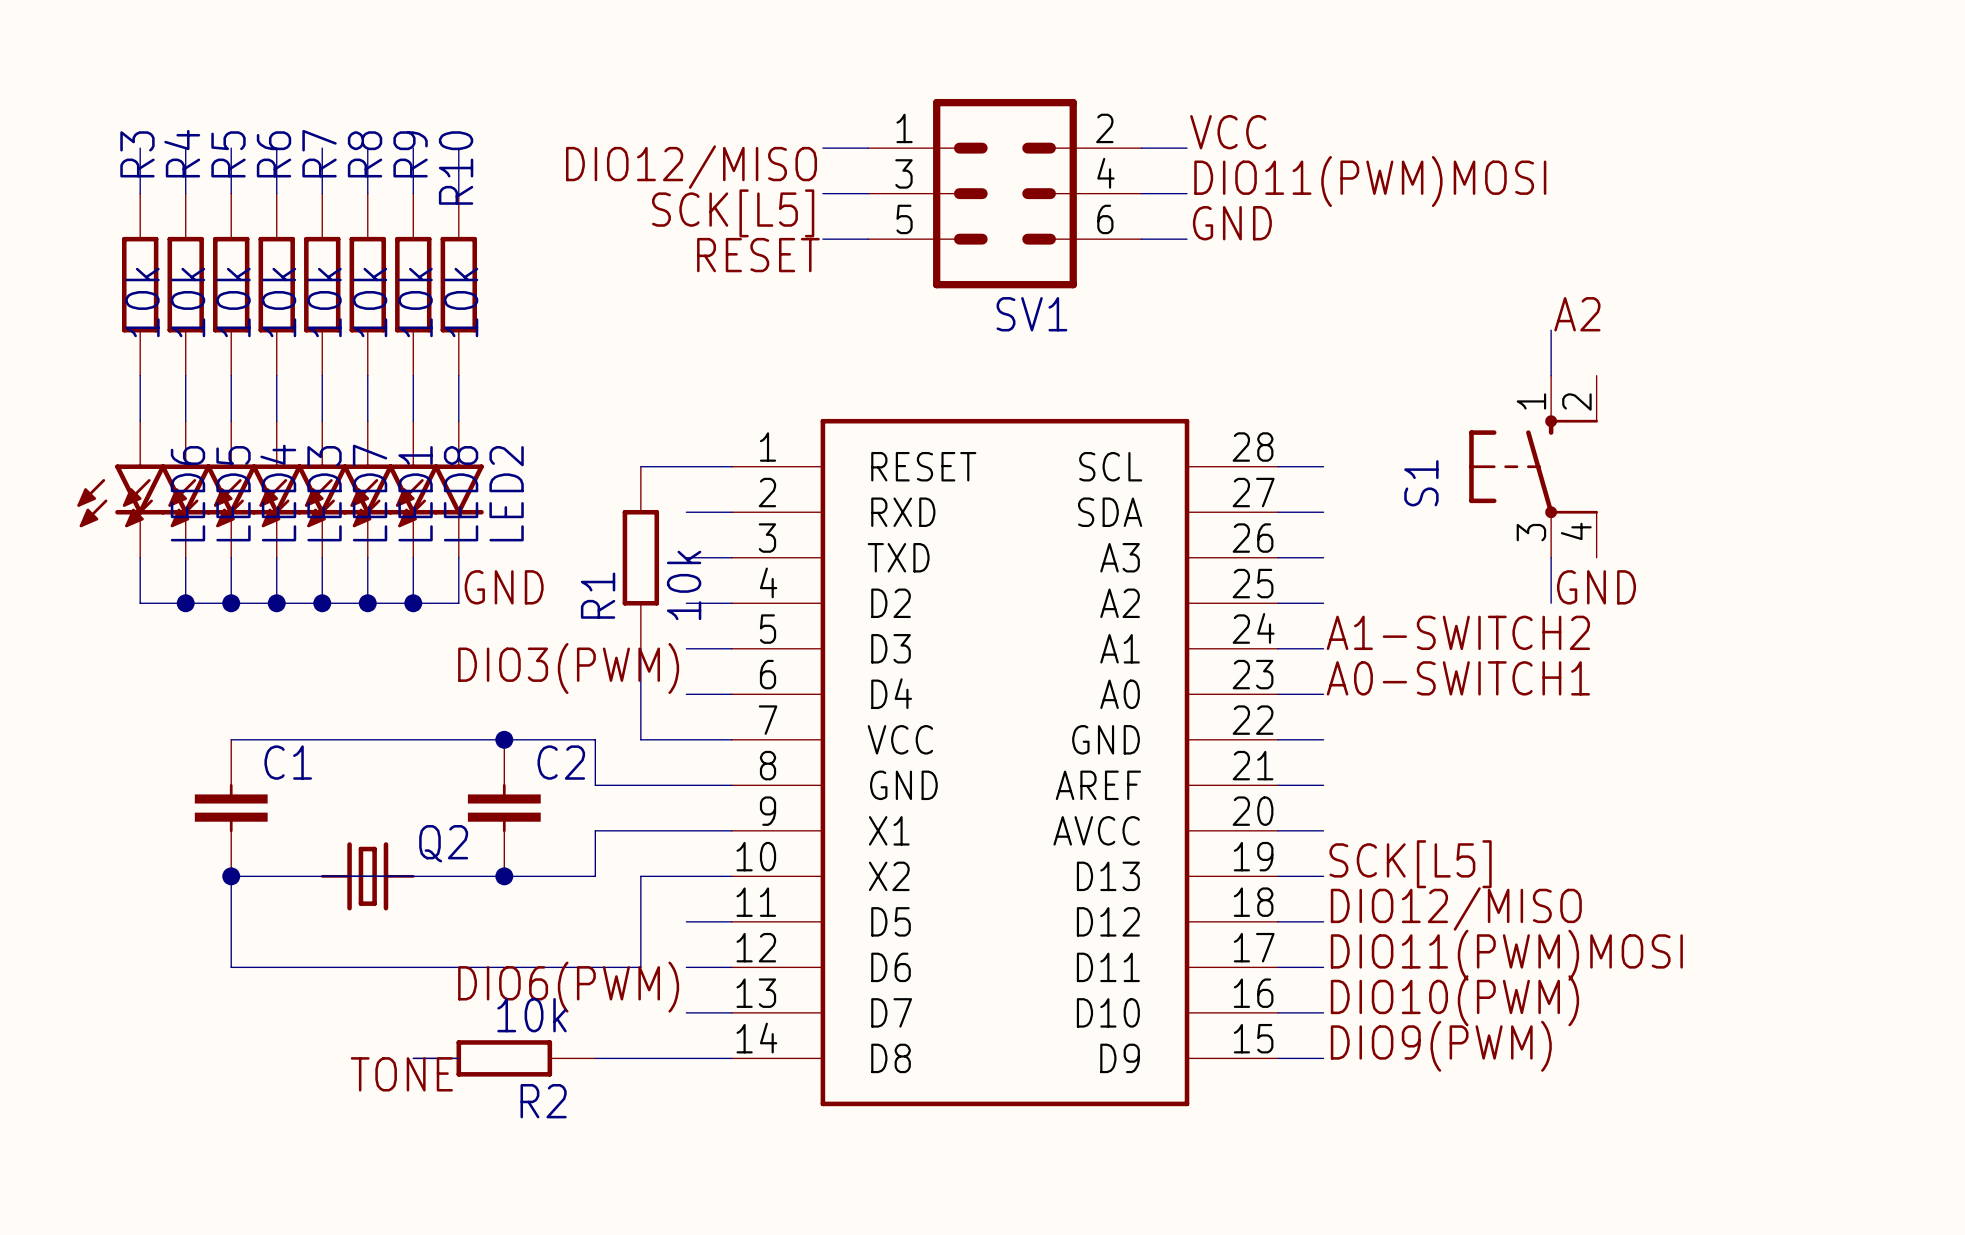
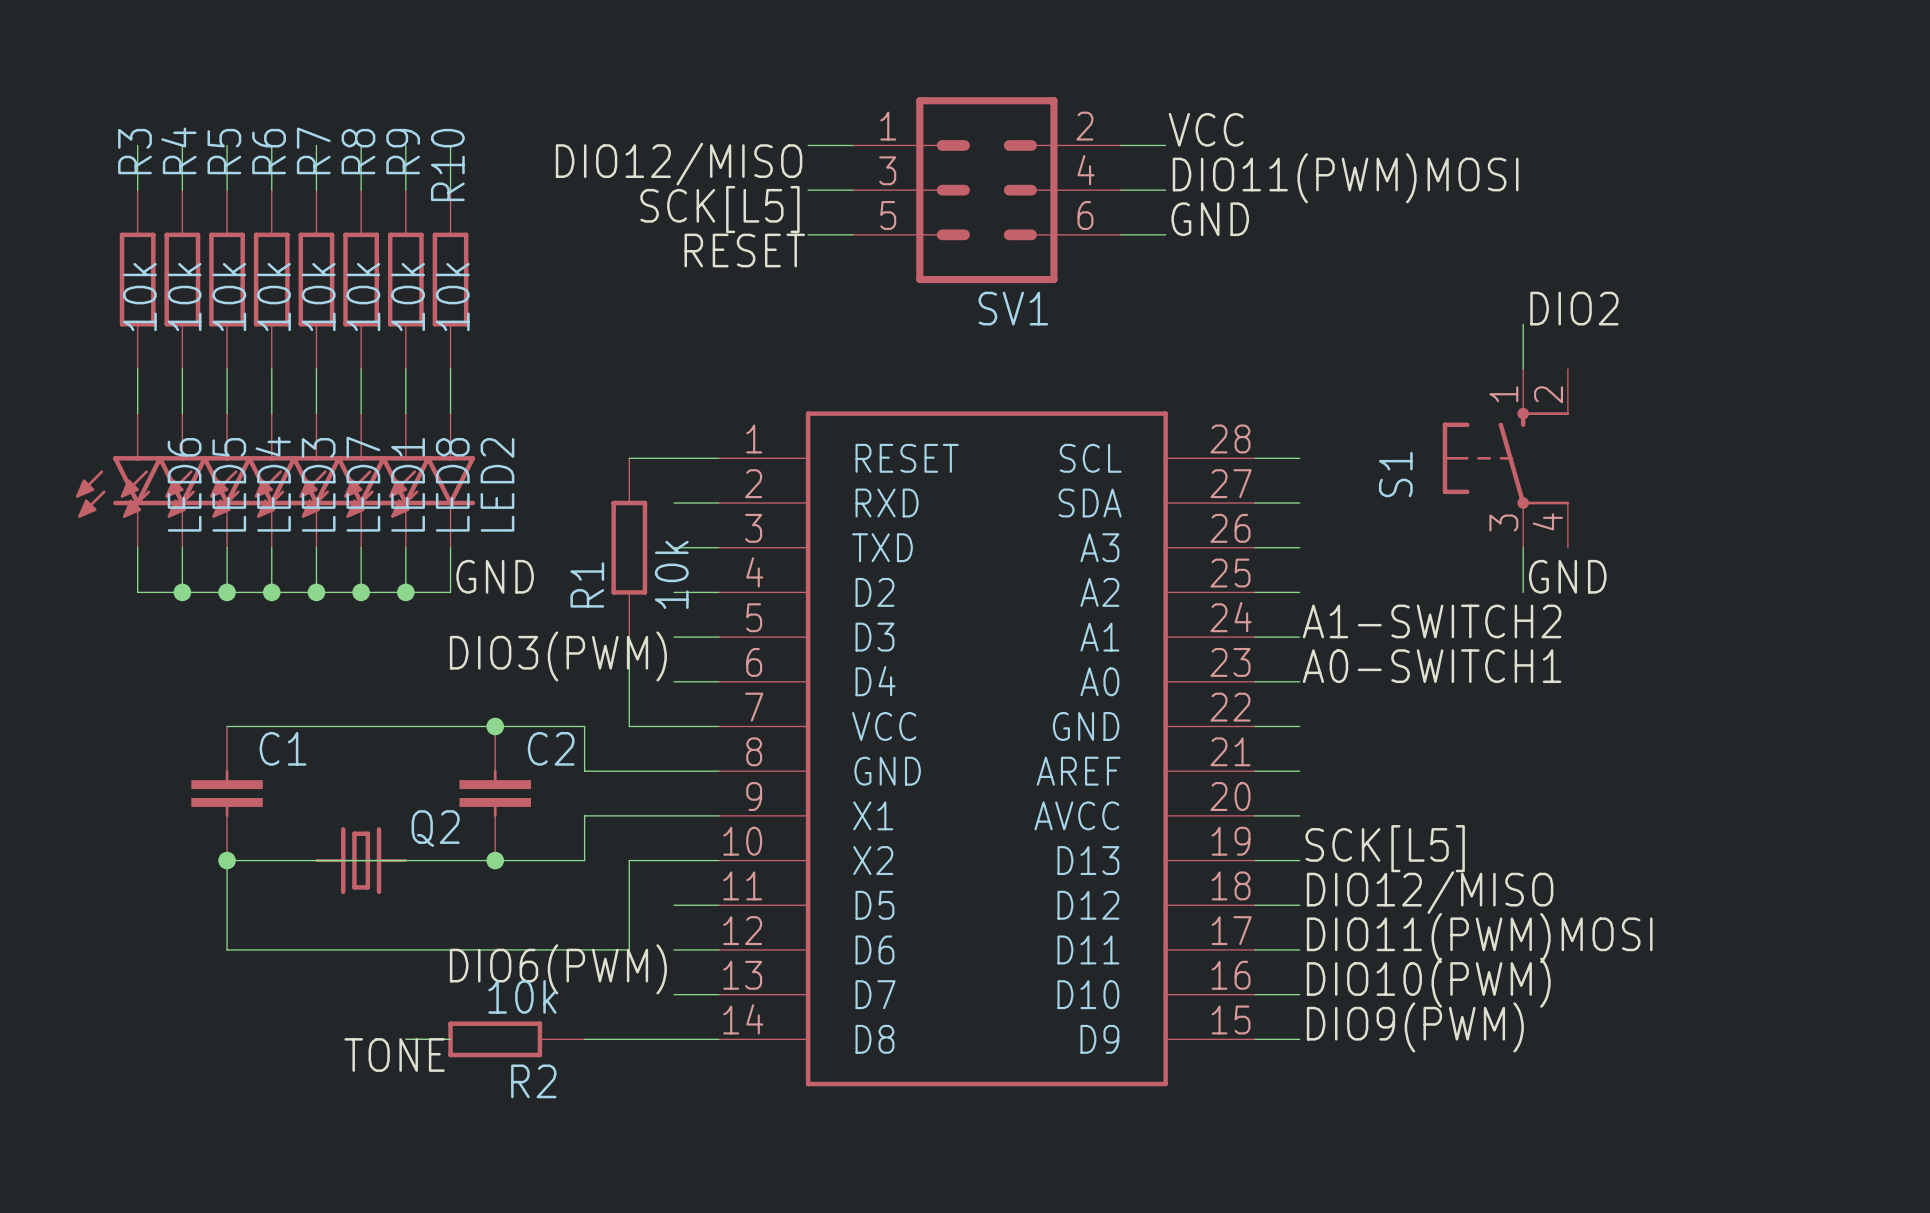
label: A2 (1577, 314) -> DIO2 (1574, 308)

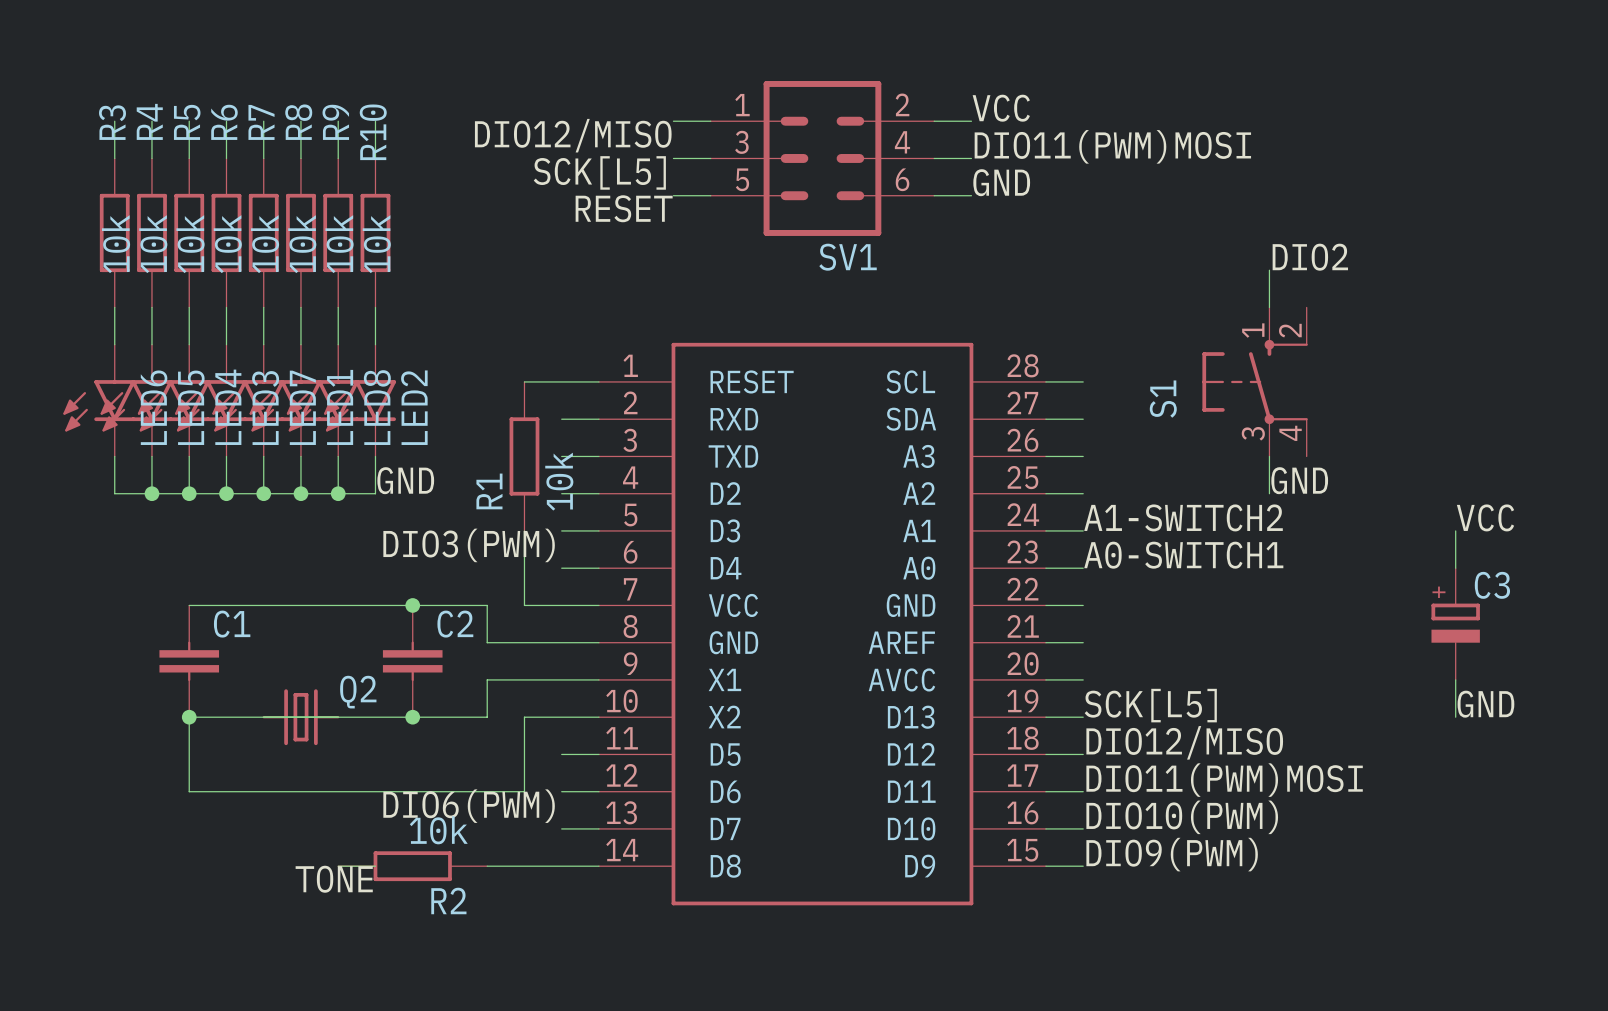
label: none -> VCC (1485, 517)
wire: none -> (1455, 530) (1455, 568)
C3: none -> (1455, 624)
wire: none -> (1455, 679) (1455, 717)
label: none -> GND (1485, 704)

